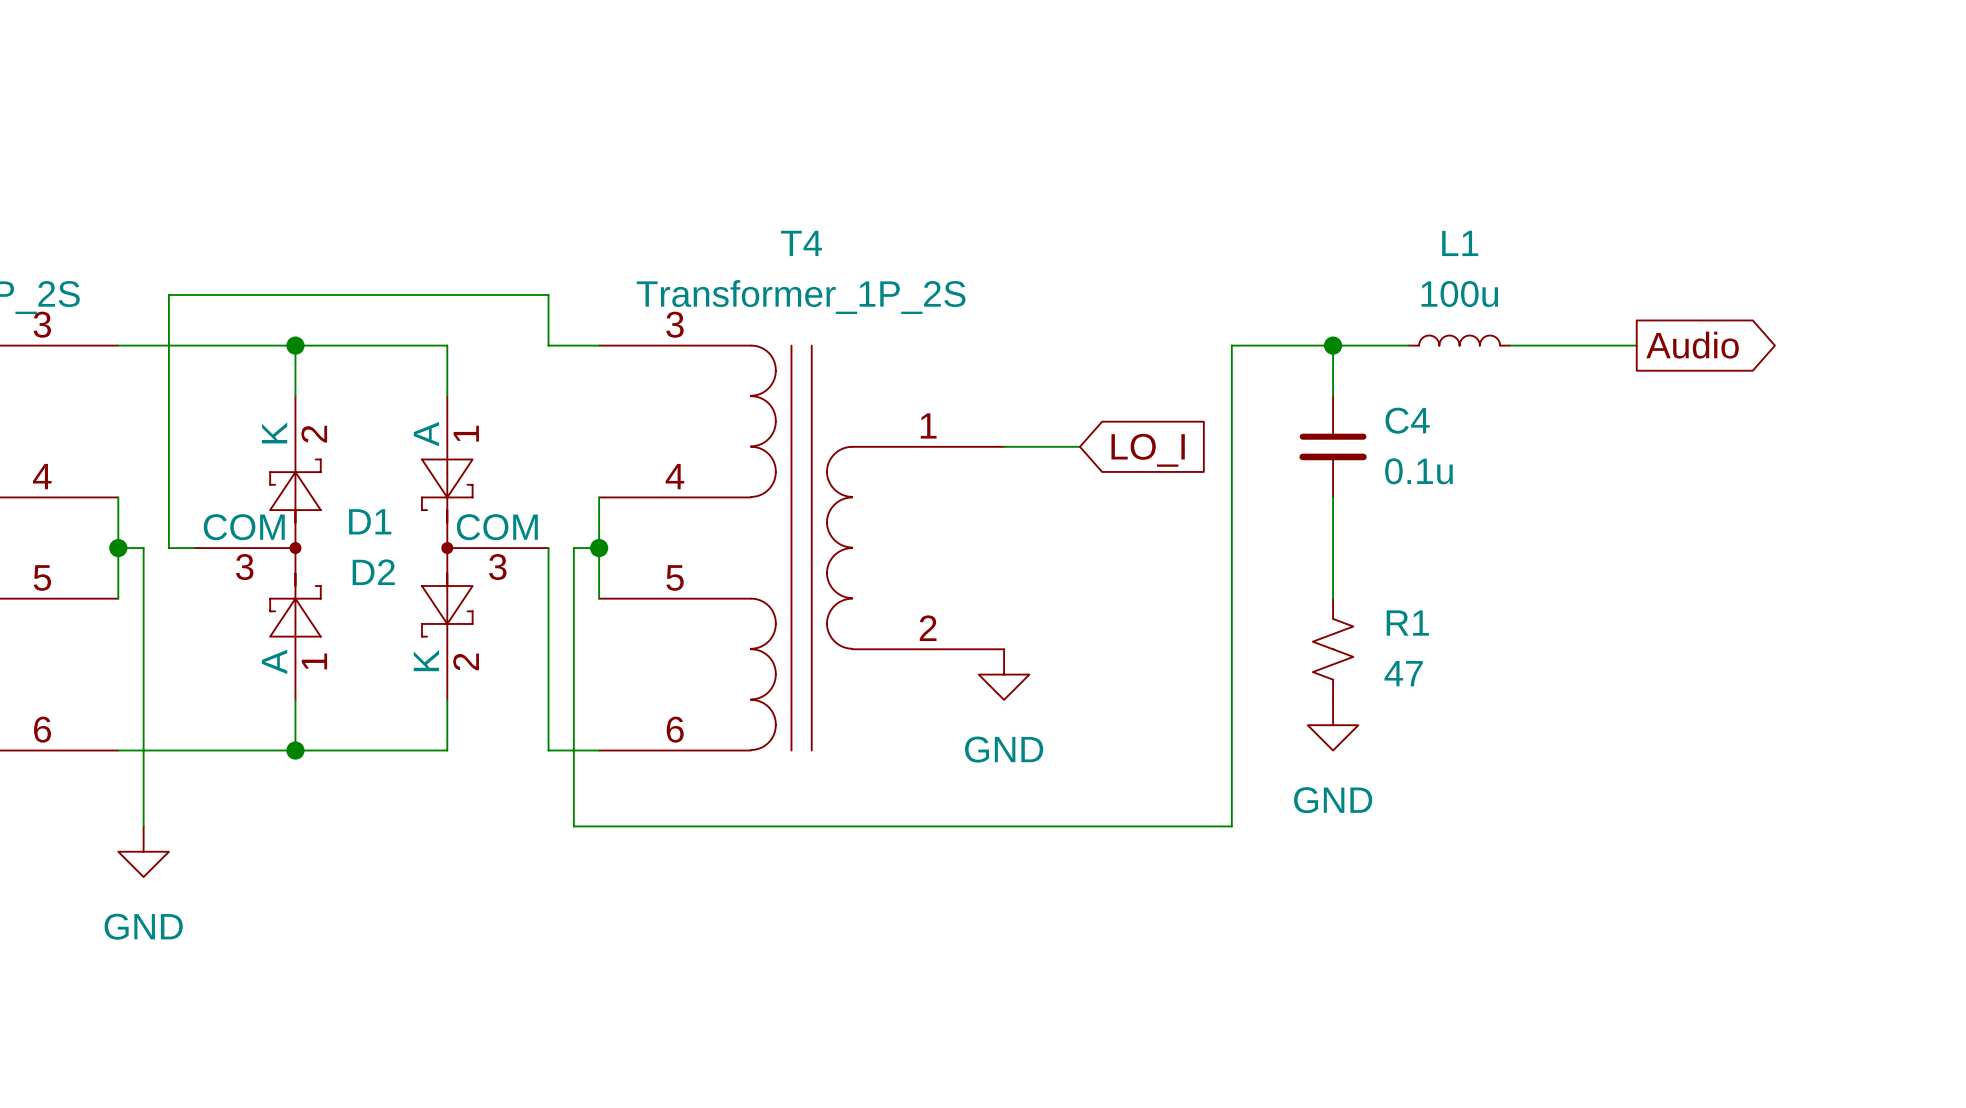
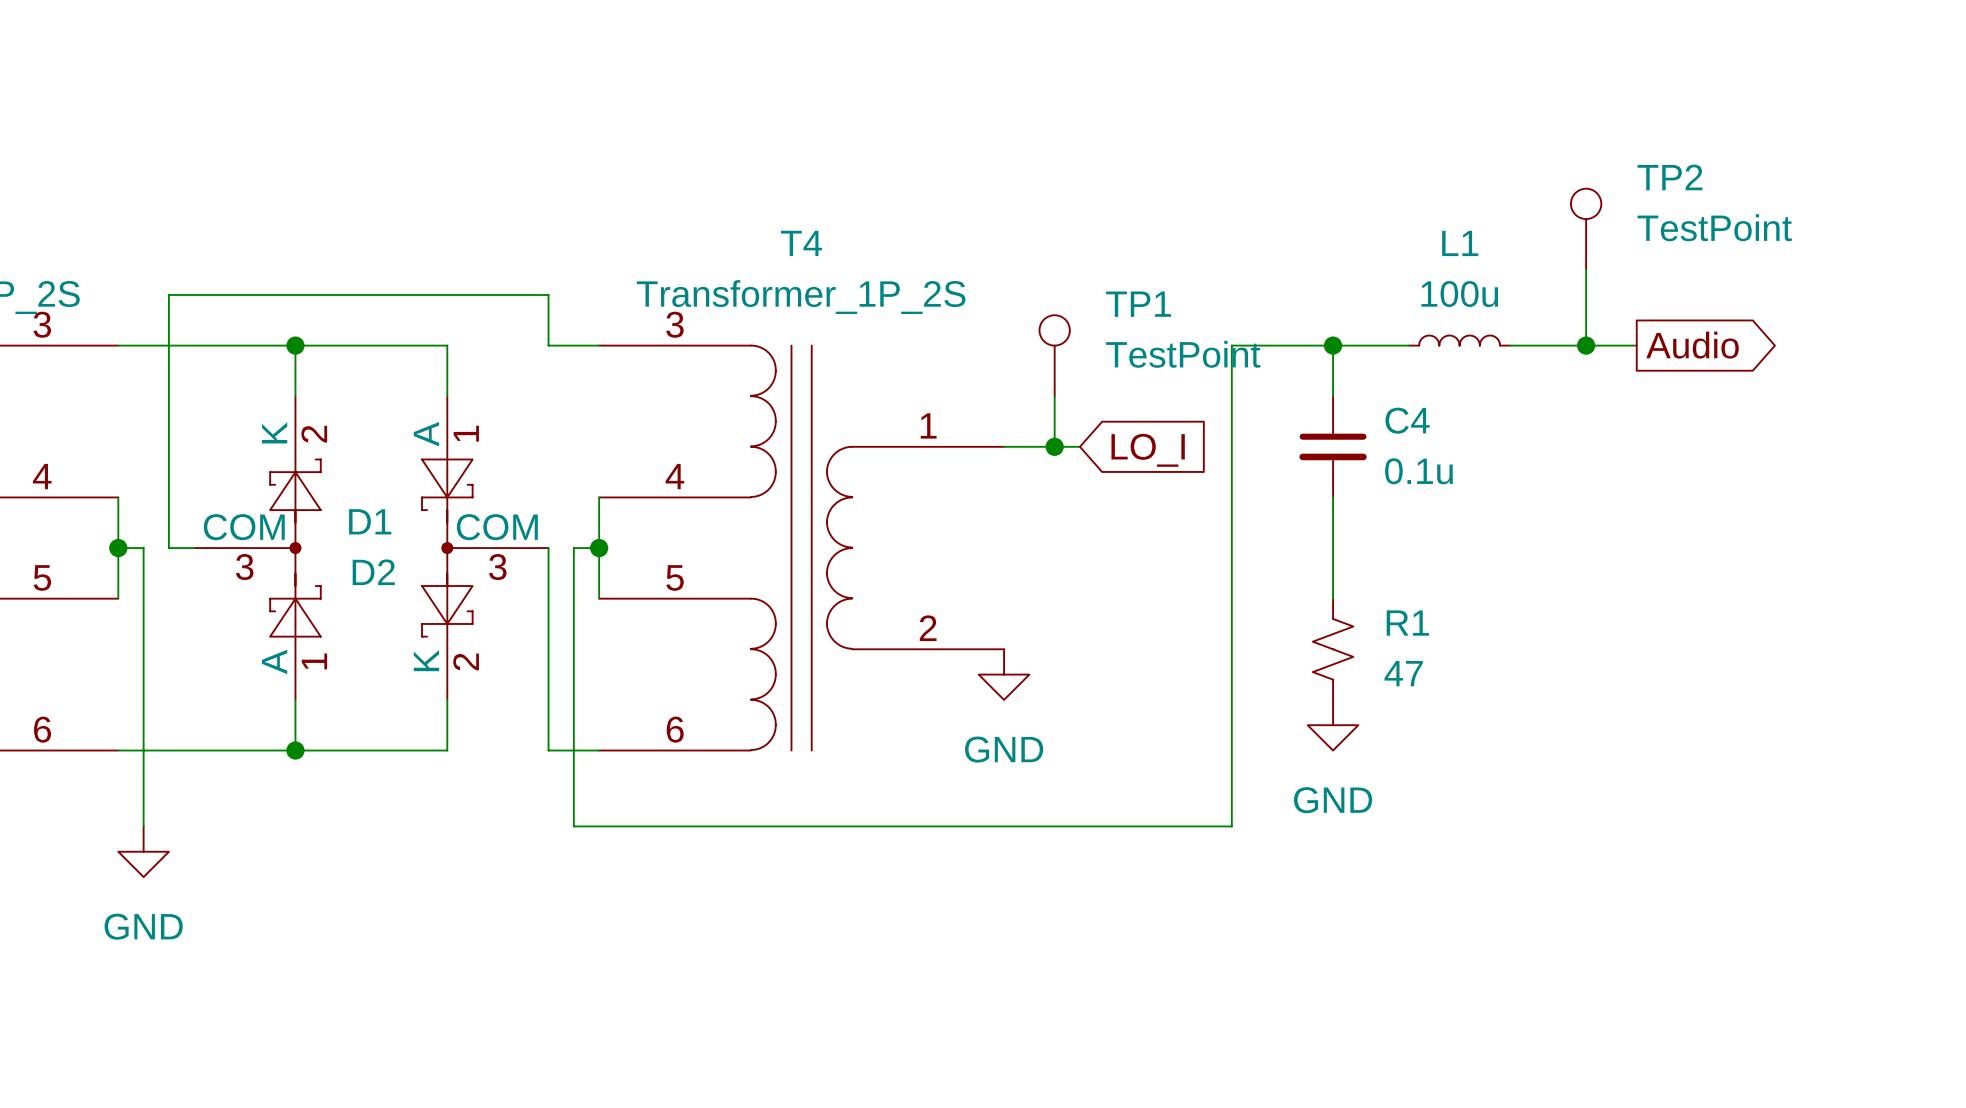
TP2: none -> TestPoint (1586, 229)
wire: none -> (1586, 269) (1586, 345)
junction: none -> (1586, 345)
TP1: none -> TestPoint (1054, 355)
wire: none -> (1054, 396) (1054, 446)
junction: none -> (1054, 446)

